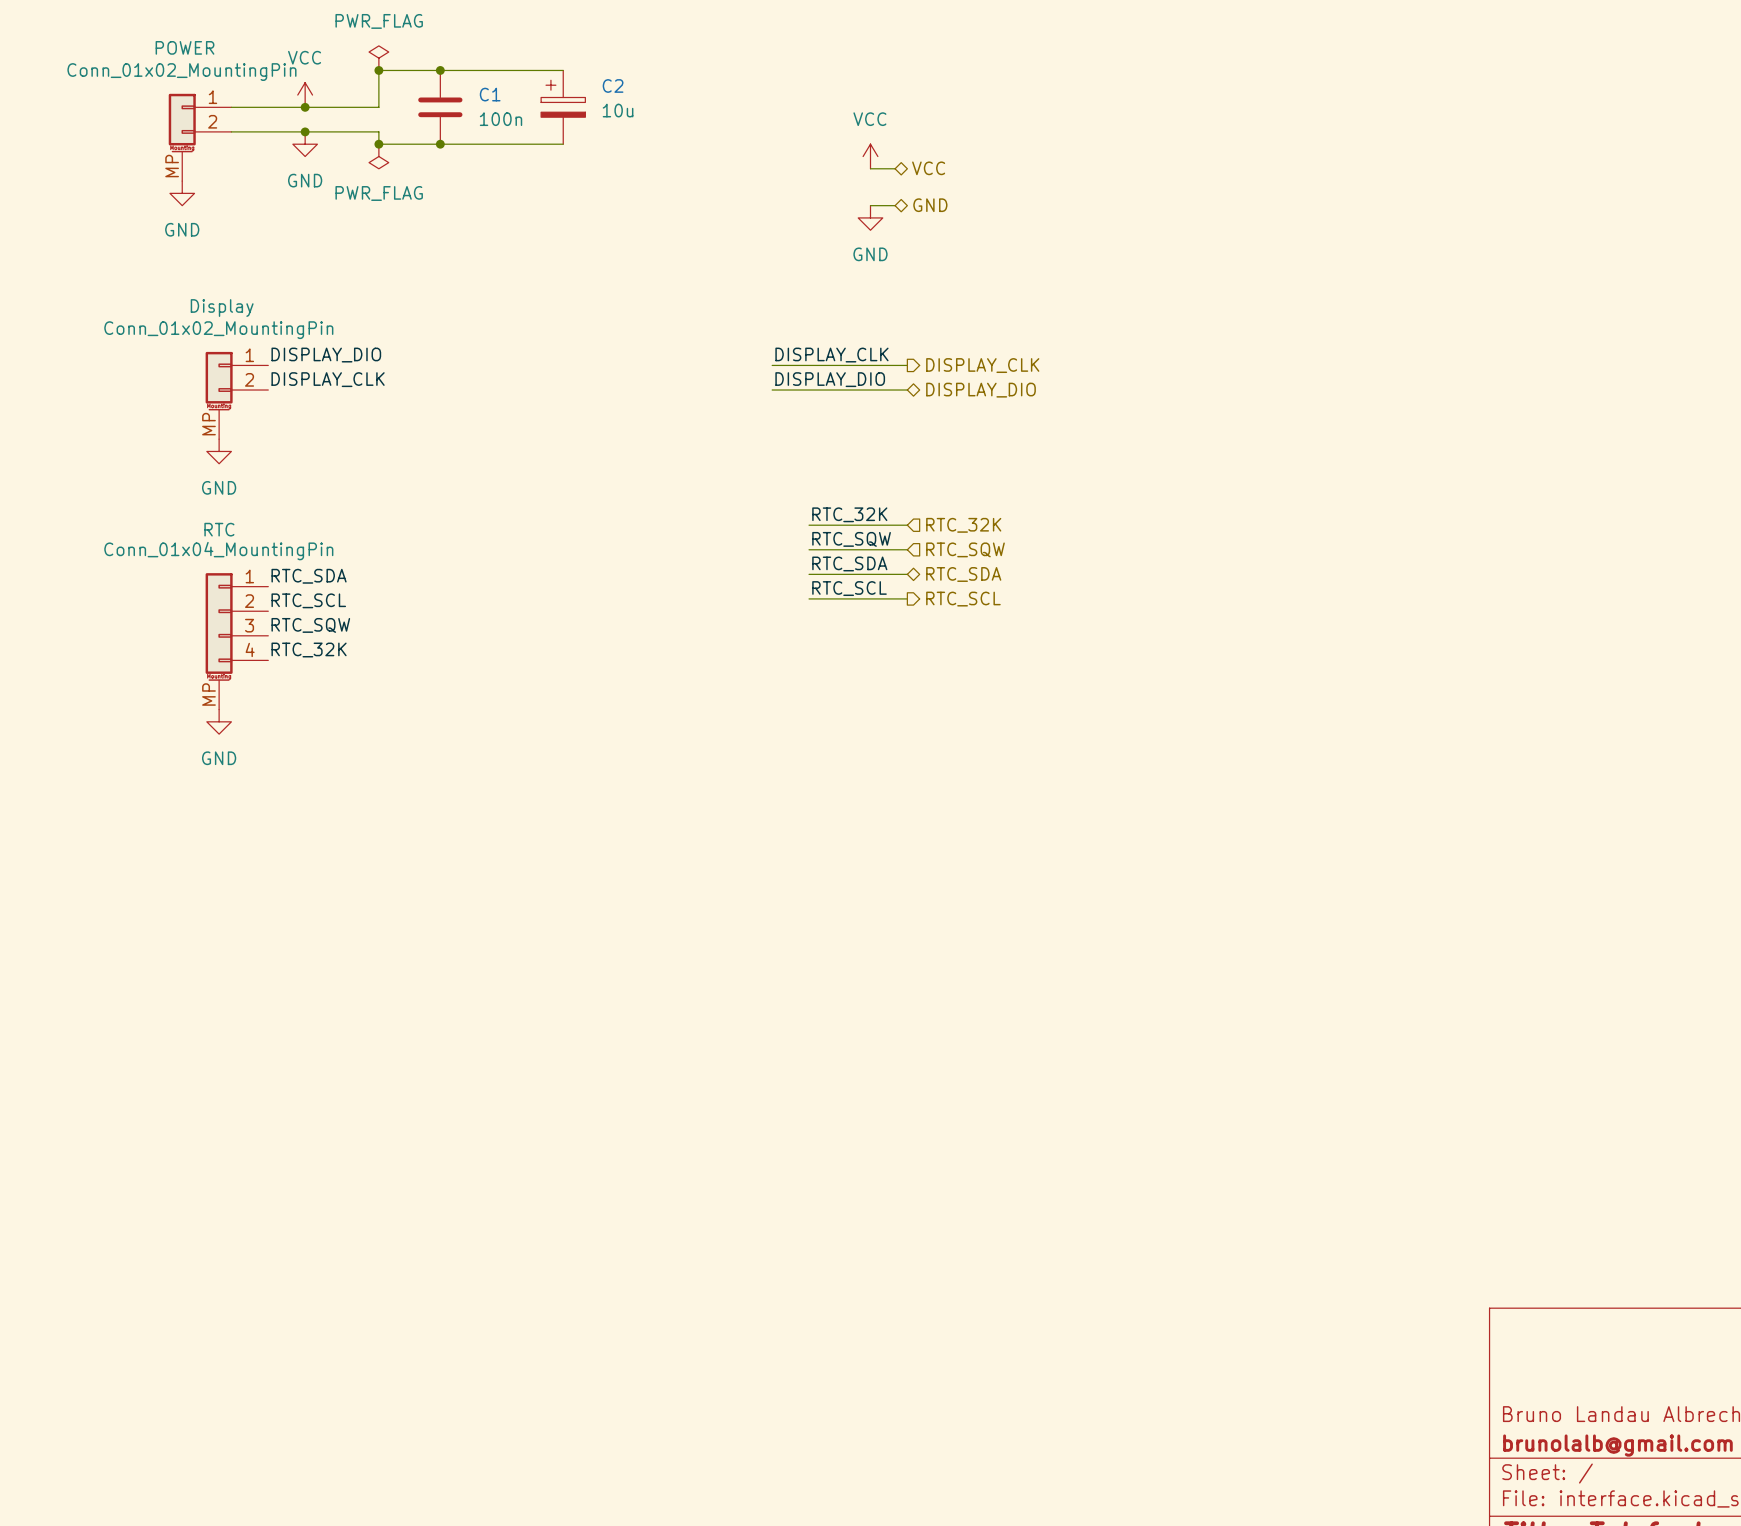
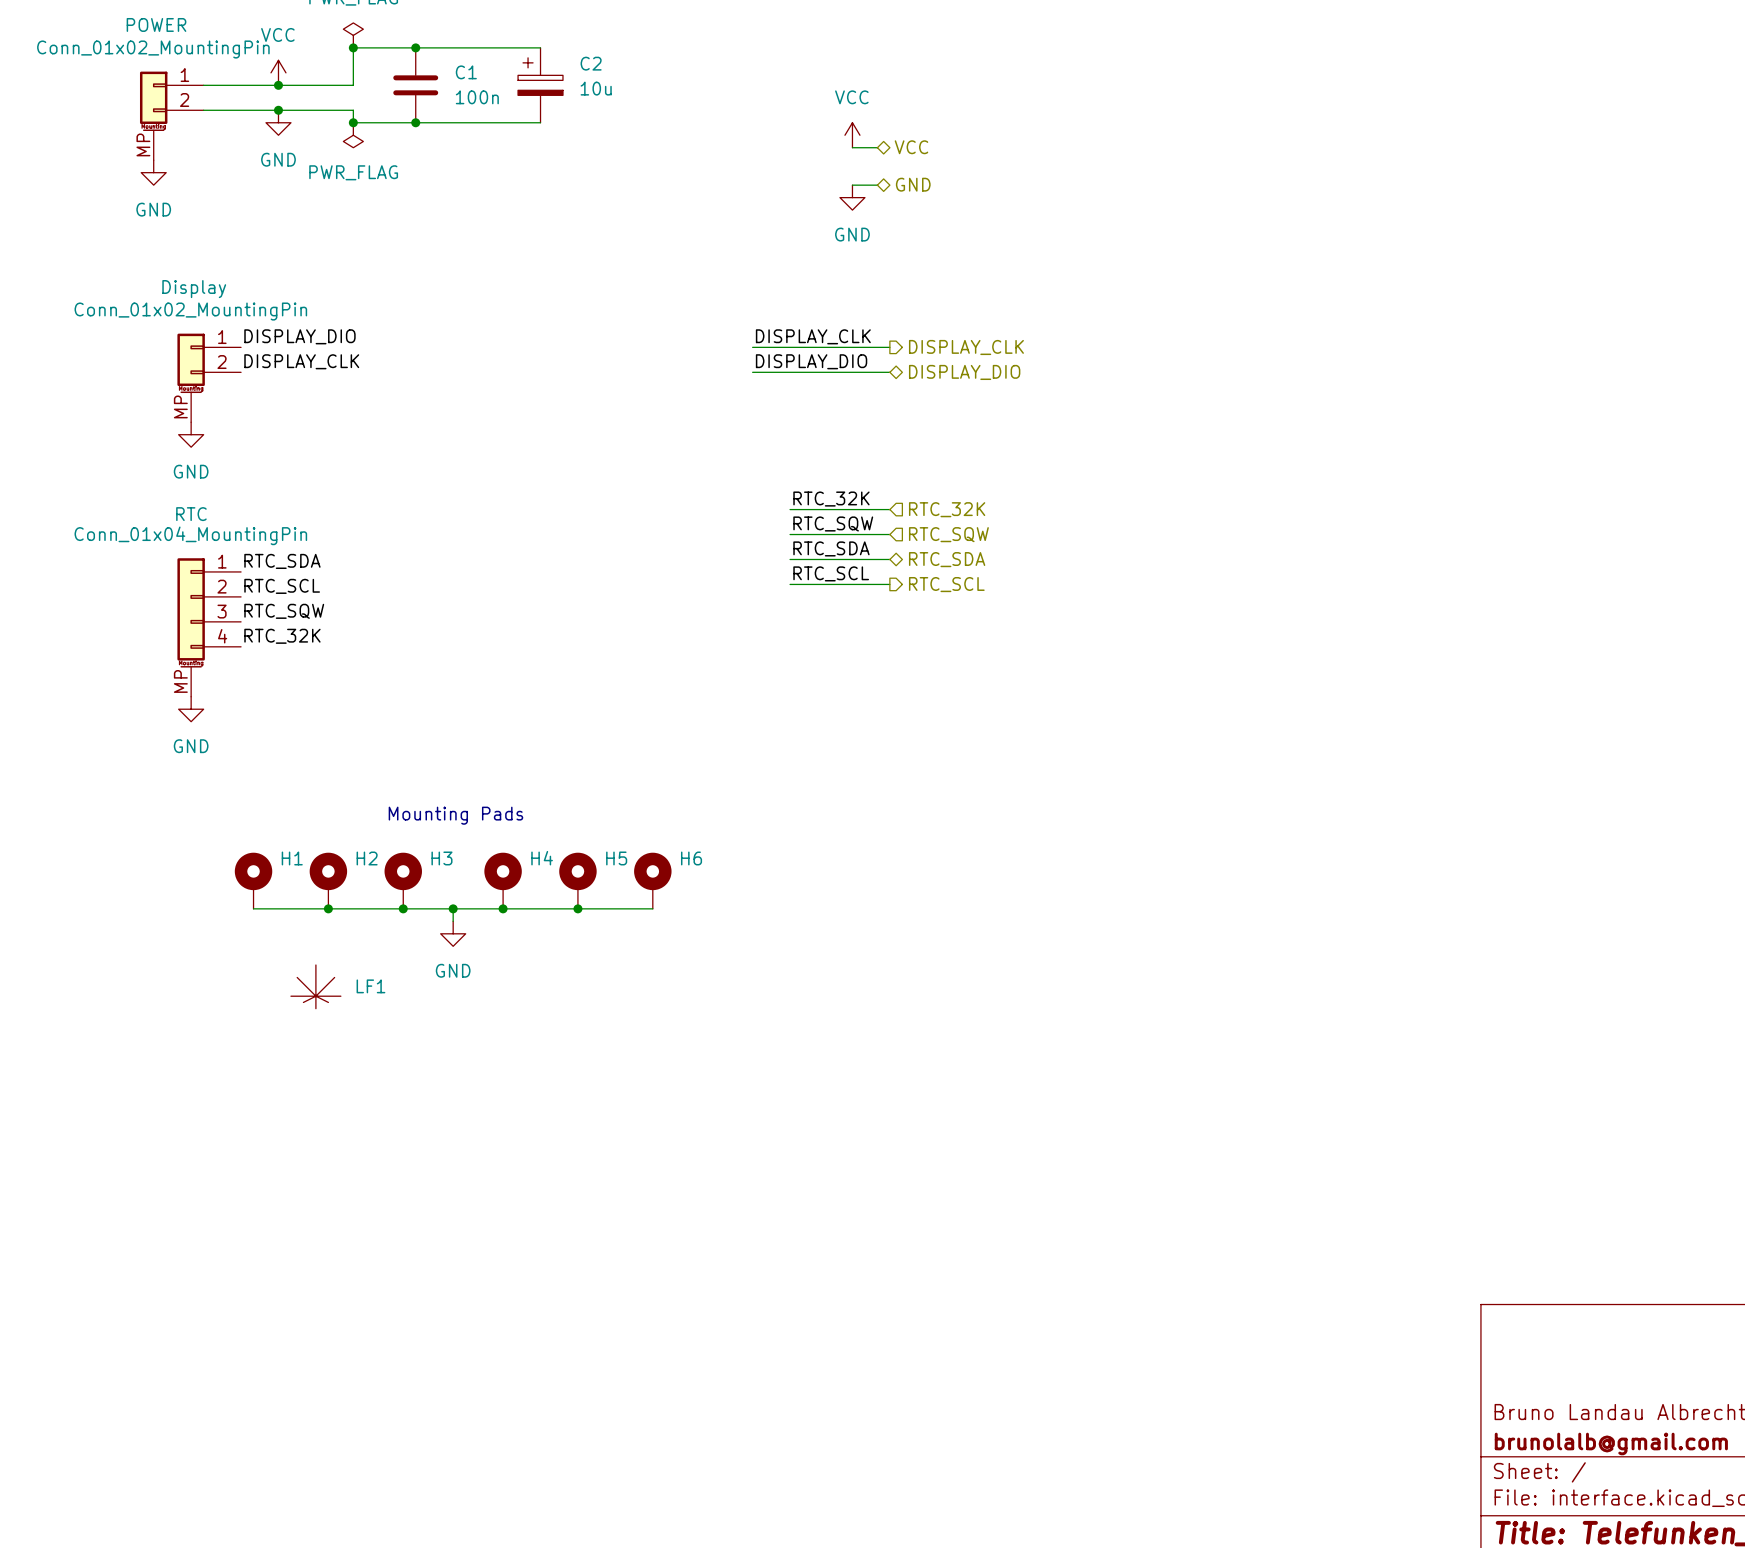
text: none -> Mounting Pads (455, 815)
H1: none -> (253, 880)
H2: none -> (328, 880)
H3: none -> (403, 880)
H4: none -> (503, 880)
H5: none -> (577, 880)
H6: none -> (652, 880)
wire: none -> (253, 908) (652, 908)
junction: none -> (328, 908)
junction: none -> (403, 908)
wire: none -> (453, 908) (453, 921)
junction: none -> (453, 908)
junction: none -> (503, 908)
junction: none -> (577, 908)
power symbol: none -> GND (453, 933)
LF1: none -> (315, 986)

